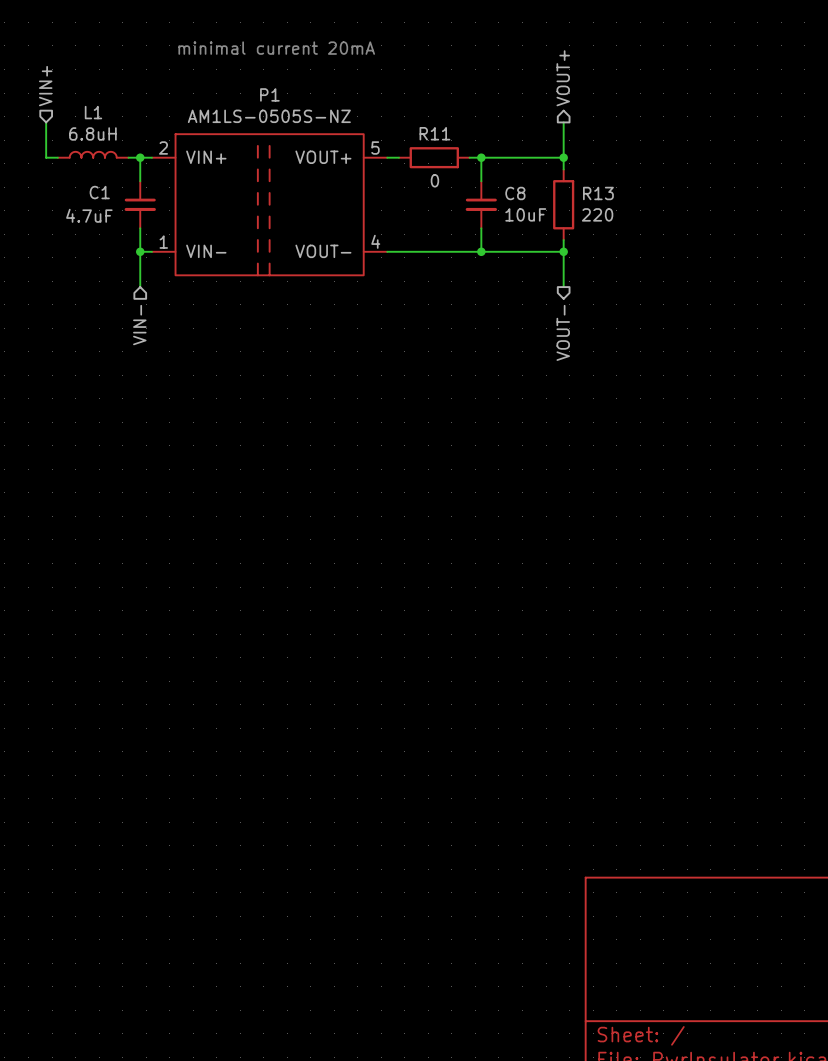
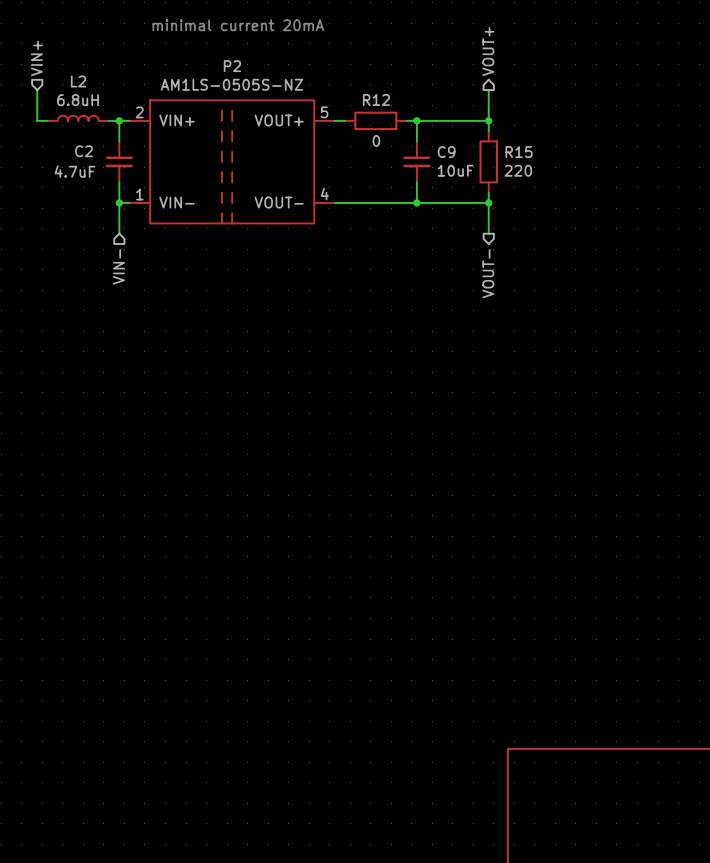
P1 name: P1 (269, 94) -> P2 (232, 66)
L1 name: L1 (93, 112) -> L2 (78, 81)
R11 name: R11 (434, 133) -> R12 (376, 99)
C1 name: C1 (99, 192) -> C2 (83, 151)
C8 name: C8 (515, 193) -> C9 (446, 152)
R13 name: R13 (598, 193) -> R15 (519, 152)

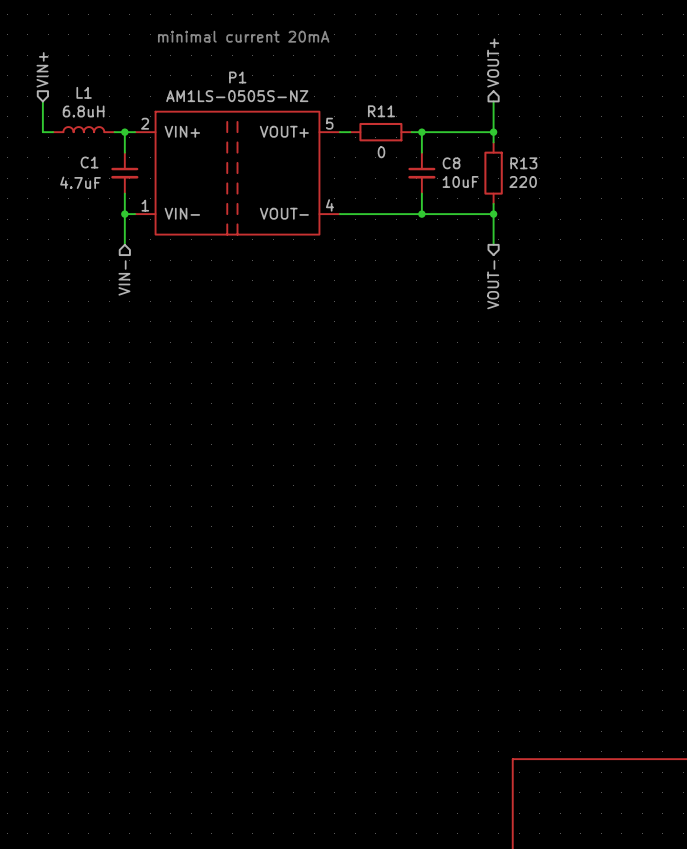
P2 name: P2 (232, 66) -> P1 (237, 77)
L2 name: L2 (78, 81) -> L1 (84, 92)
R12 name: R12 (376, 99) -> R11 (381, 111)
C2 name: C2 (83, 151) -> C1 (89, 162)
C9 name: C9 (446, 152) -> C8 (451, 163)
R15 name: R15 (519, 152) -> R13 (523, 163)

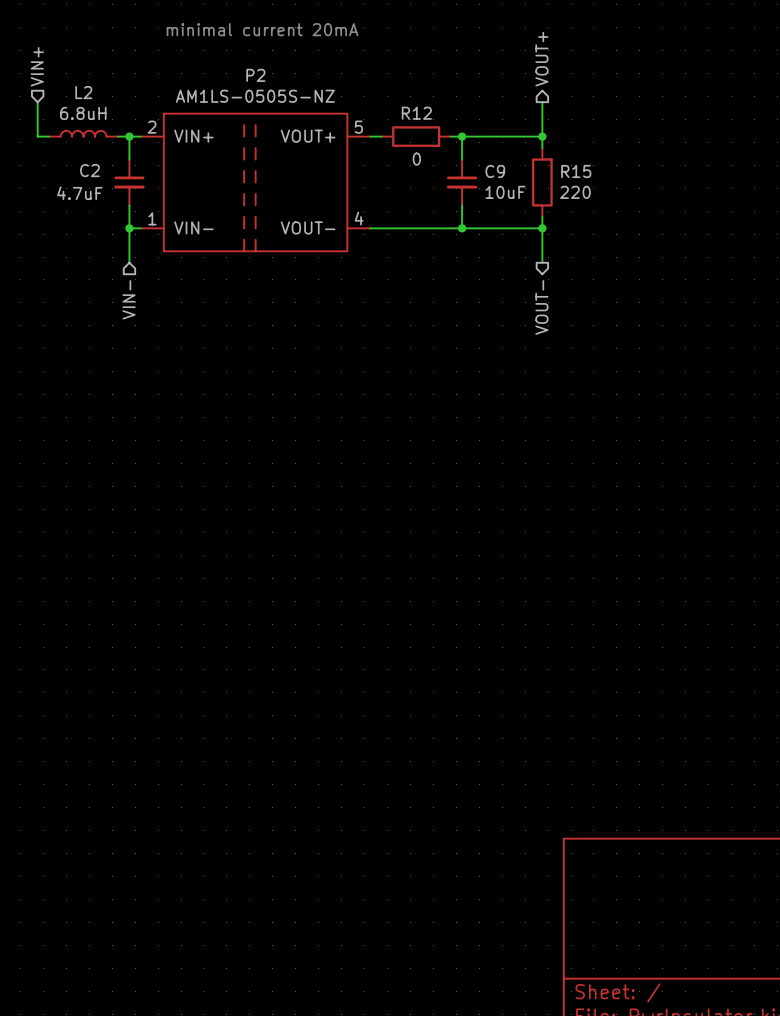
P1 name: P1 (237, 77) -> P2 (255, 75)
L1 name: L1 (84, 92) -> L2 (83, 92)
R11 name: R11 (381, 111) -> R12 (416, 113)
C1 name: C1 (89, 162) -> C2 (89, 170)
C8 name: C8 (451, 163) -> C9 (495, 171)
R13 name: R13 (523, 163) -> R15 (576, 171)

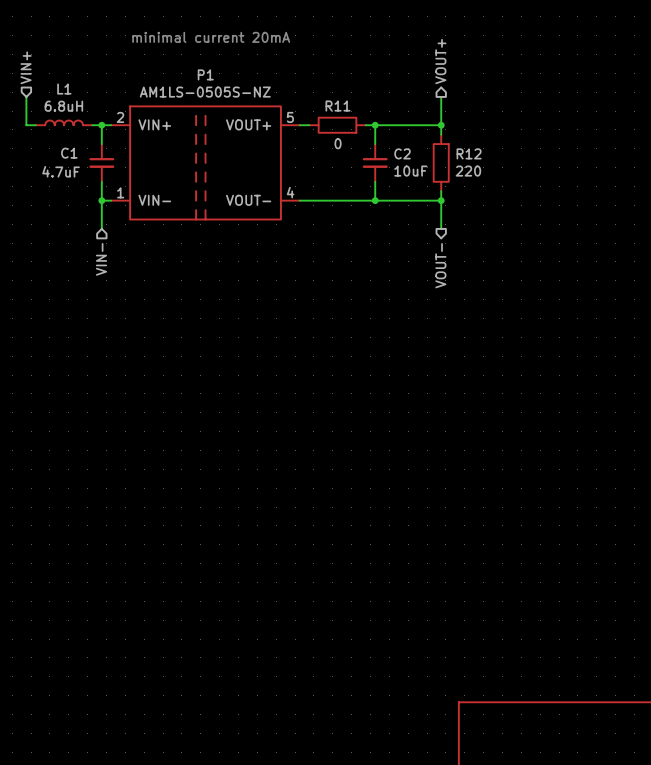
P2 name: P2 (255, 75) -> P1 (205, 74)
L2 name: L2 (83, 92) -> L1 (64, 89)
R12 name: R12 (416, 113) -> R11 (338, 106)
C2 name: C2 (89, 170) -> C1 (69, 153)
C9 name: C9 (495, 171) -> C2 (402, 153)
R15 name: R15 (576, 171) -> R12 (469, 153)

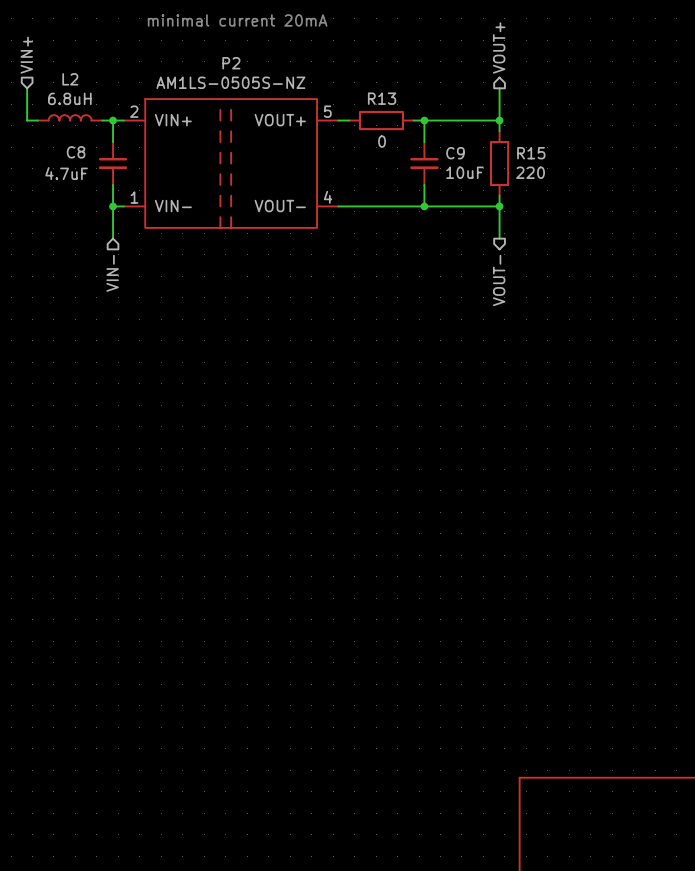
P1 name: P1 (205, 74) -> P2 (231, 63)
L1 name: L1 (64, 89) -> L2 (70, 79)
R11 name: R11 (338, 106) -> R13 (382, 98)
C1 name: C1 (69, 153) -> C8 (76, 152)
C2 name: C2 (402, 153) -> C9 (455, 153)
R12 name: R12 (469, 153) -> R15 (531, 153)

